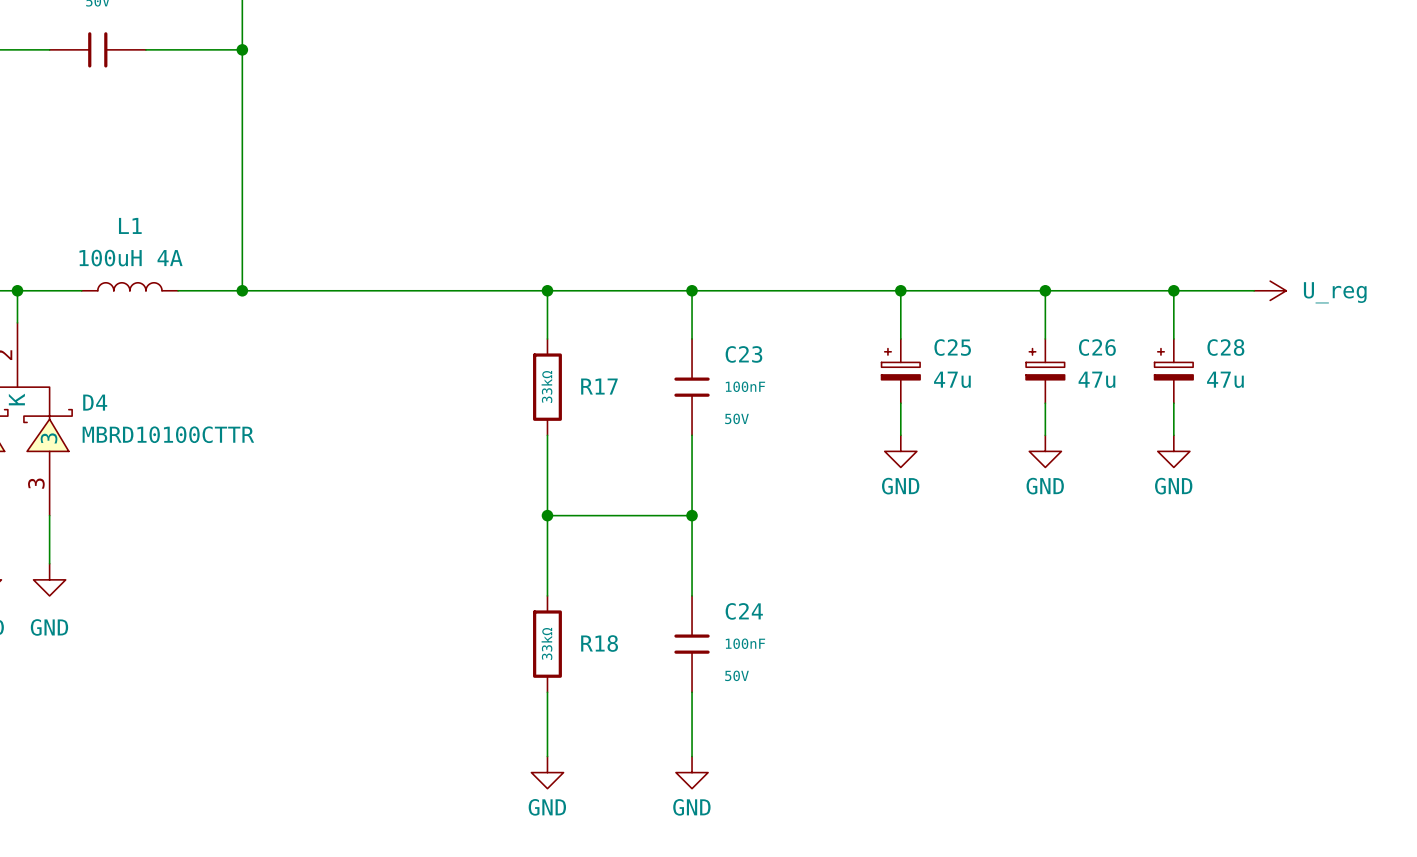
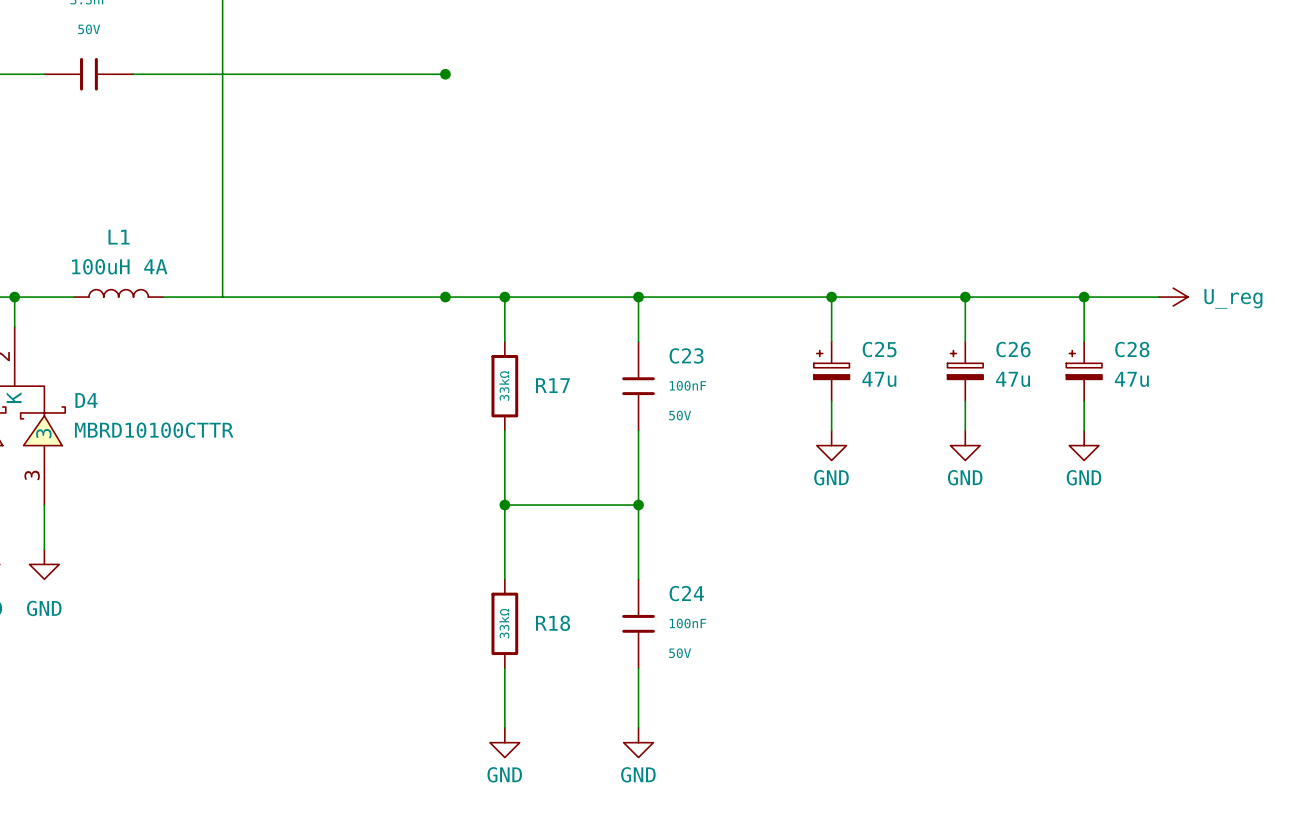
wire: none -> (222, 74) (445, 74)
junction: (242, 49) -> none
junction: none -> (445, 74)
junction: (242, 290) -> none
junction: none -> (445, 297)

